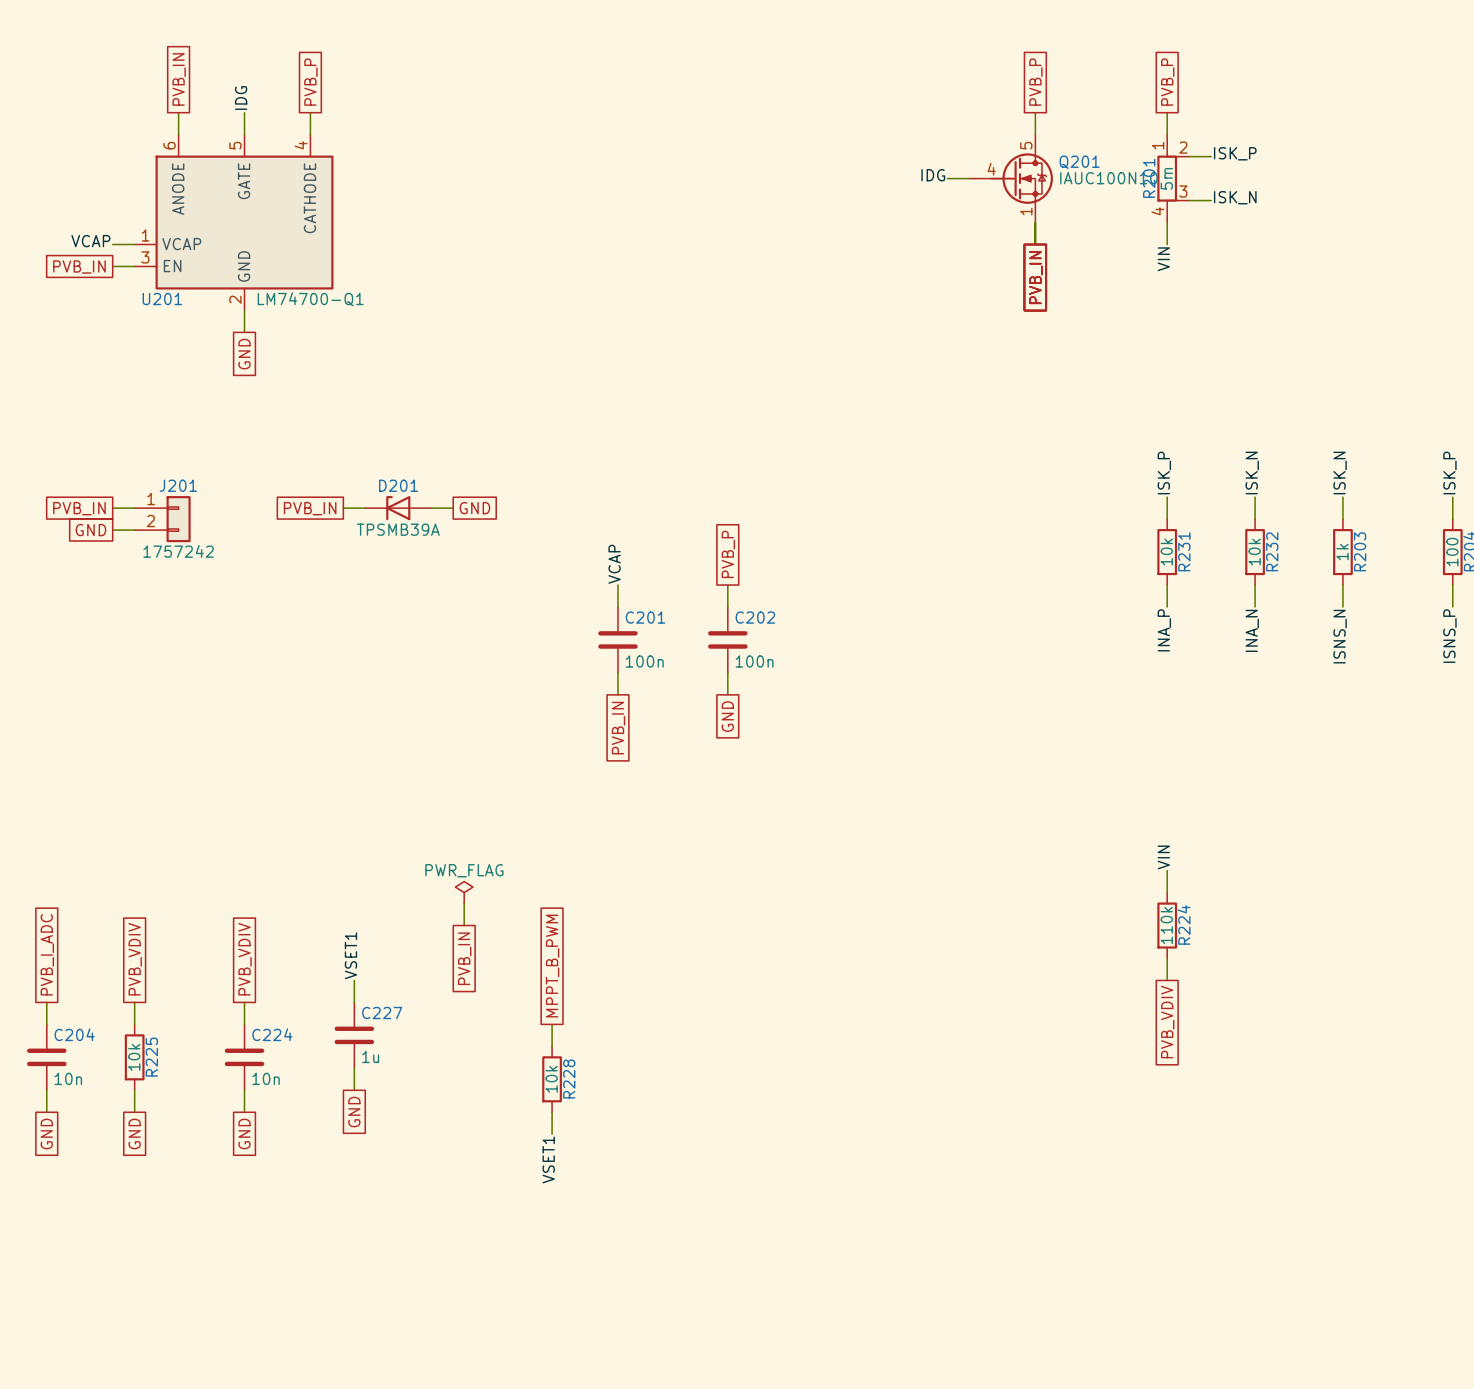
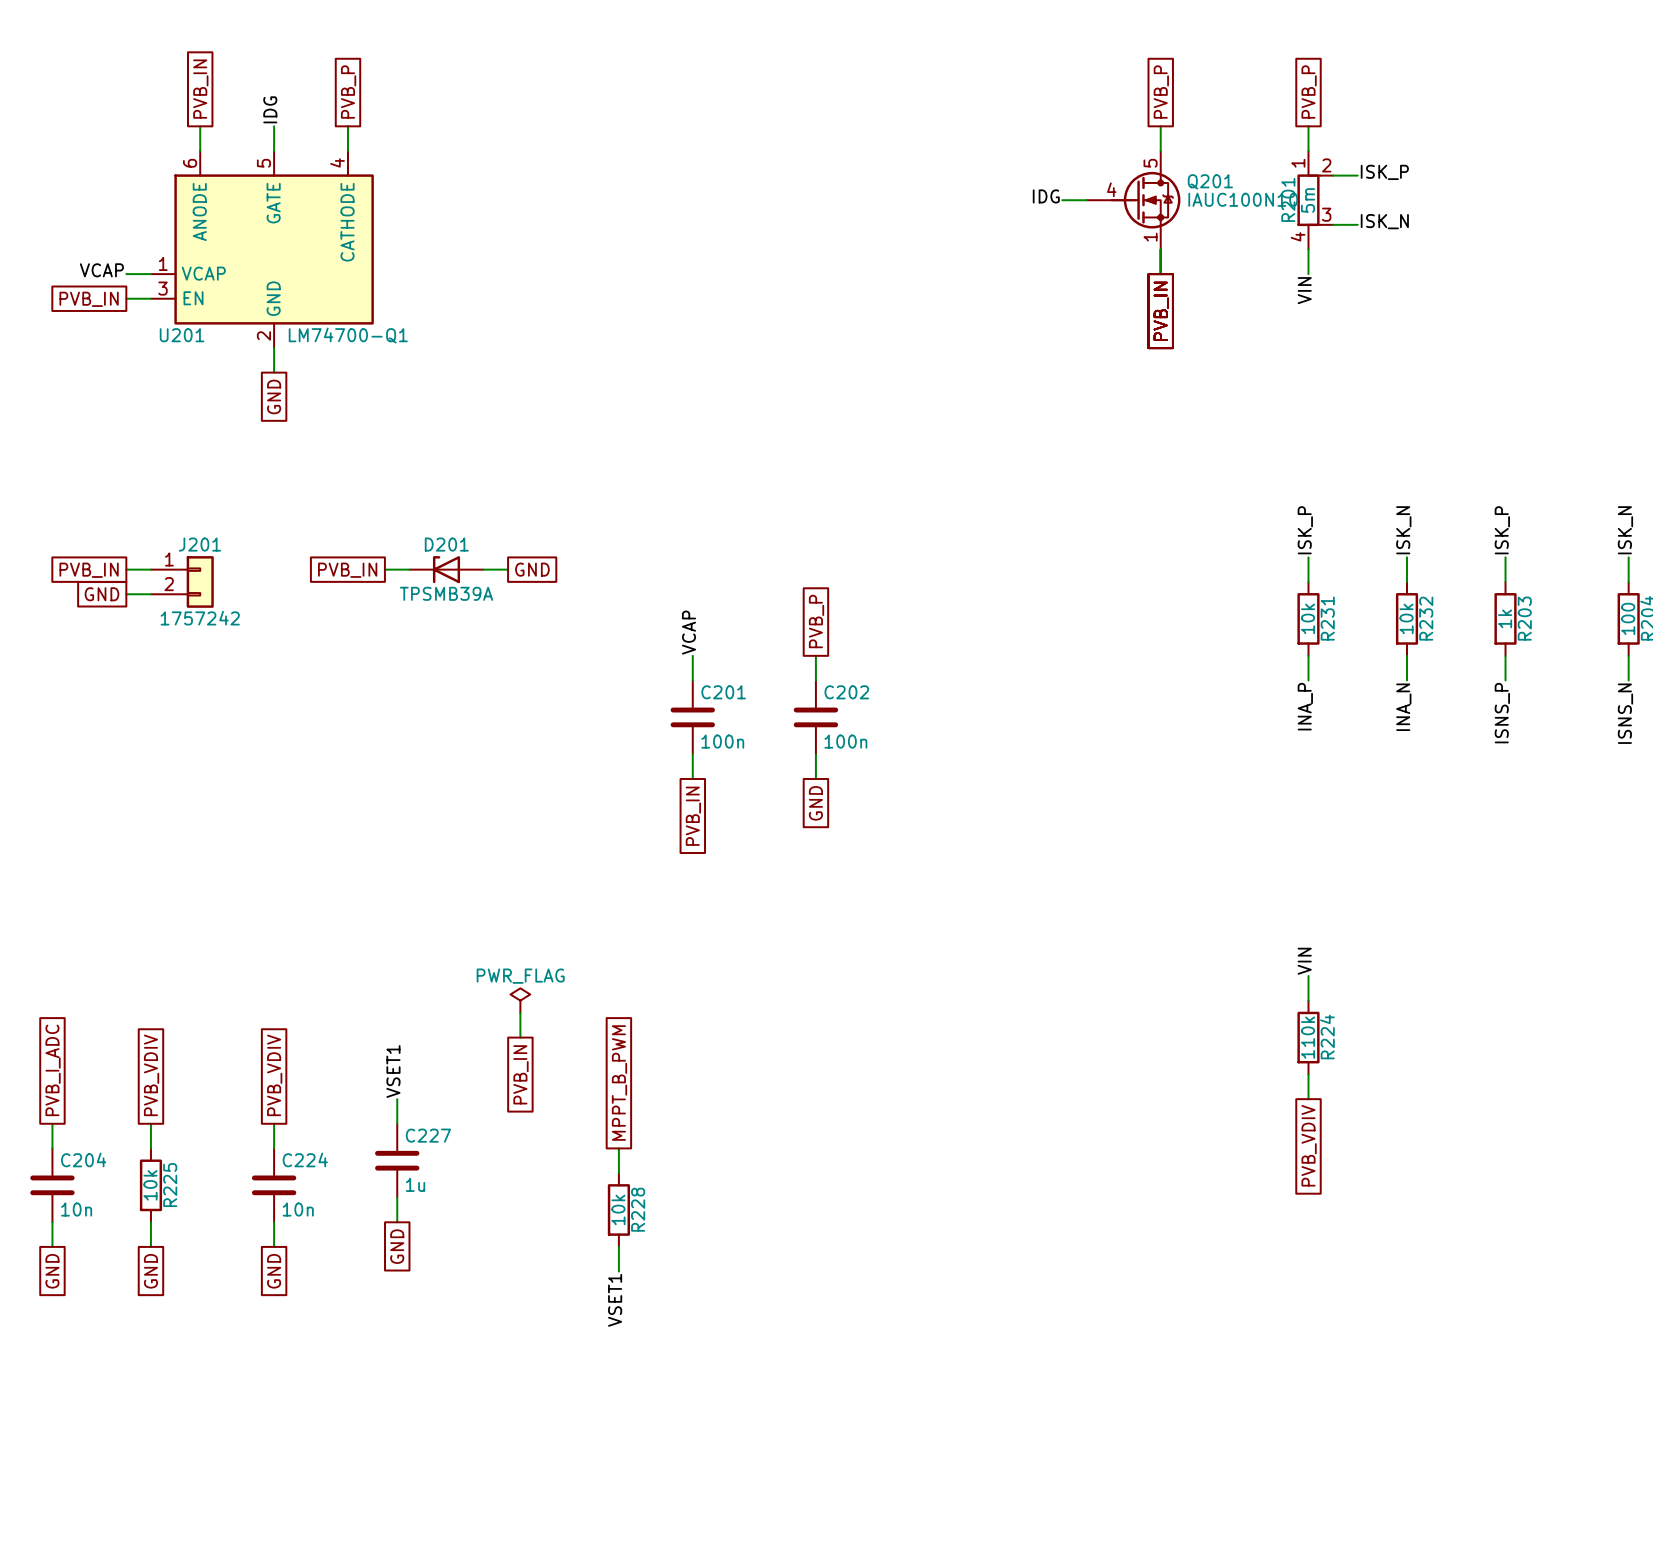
label: ISK_N (1340, 473) -> ISK_P (1502, 530)
label: ISK_P (1449, 473) -> ISK_N (1625, 530)
label: ISNS_N (1340, 636) -> ISNS_P (1502, 713)
label: ISNS_P (1449, 636) -> ISNS_N (1625, 713)

